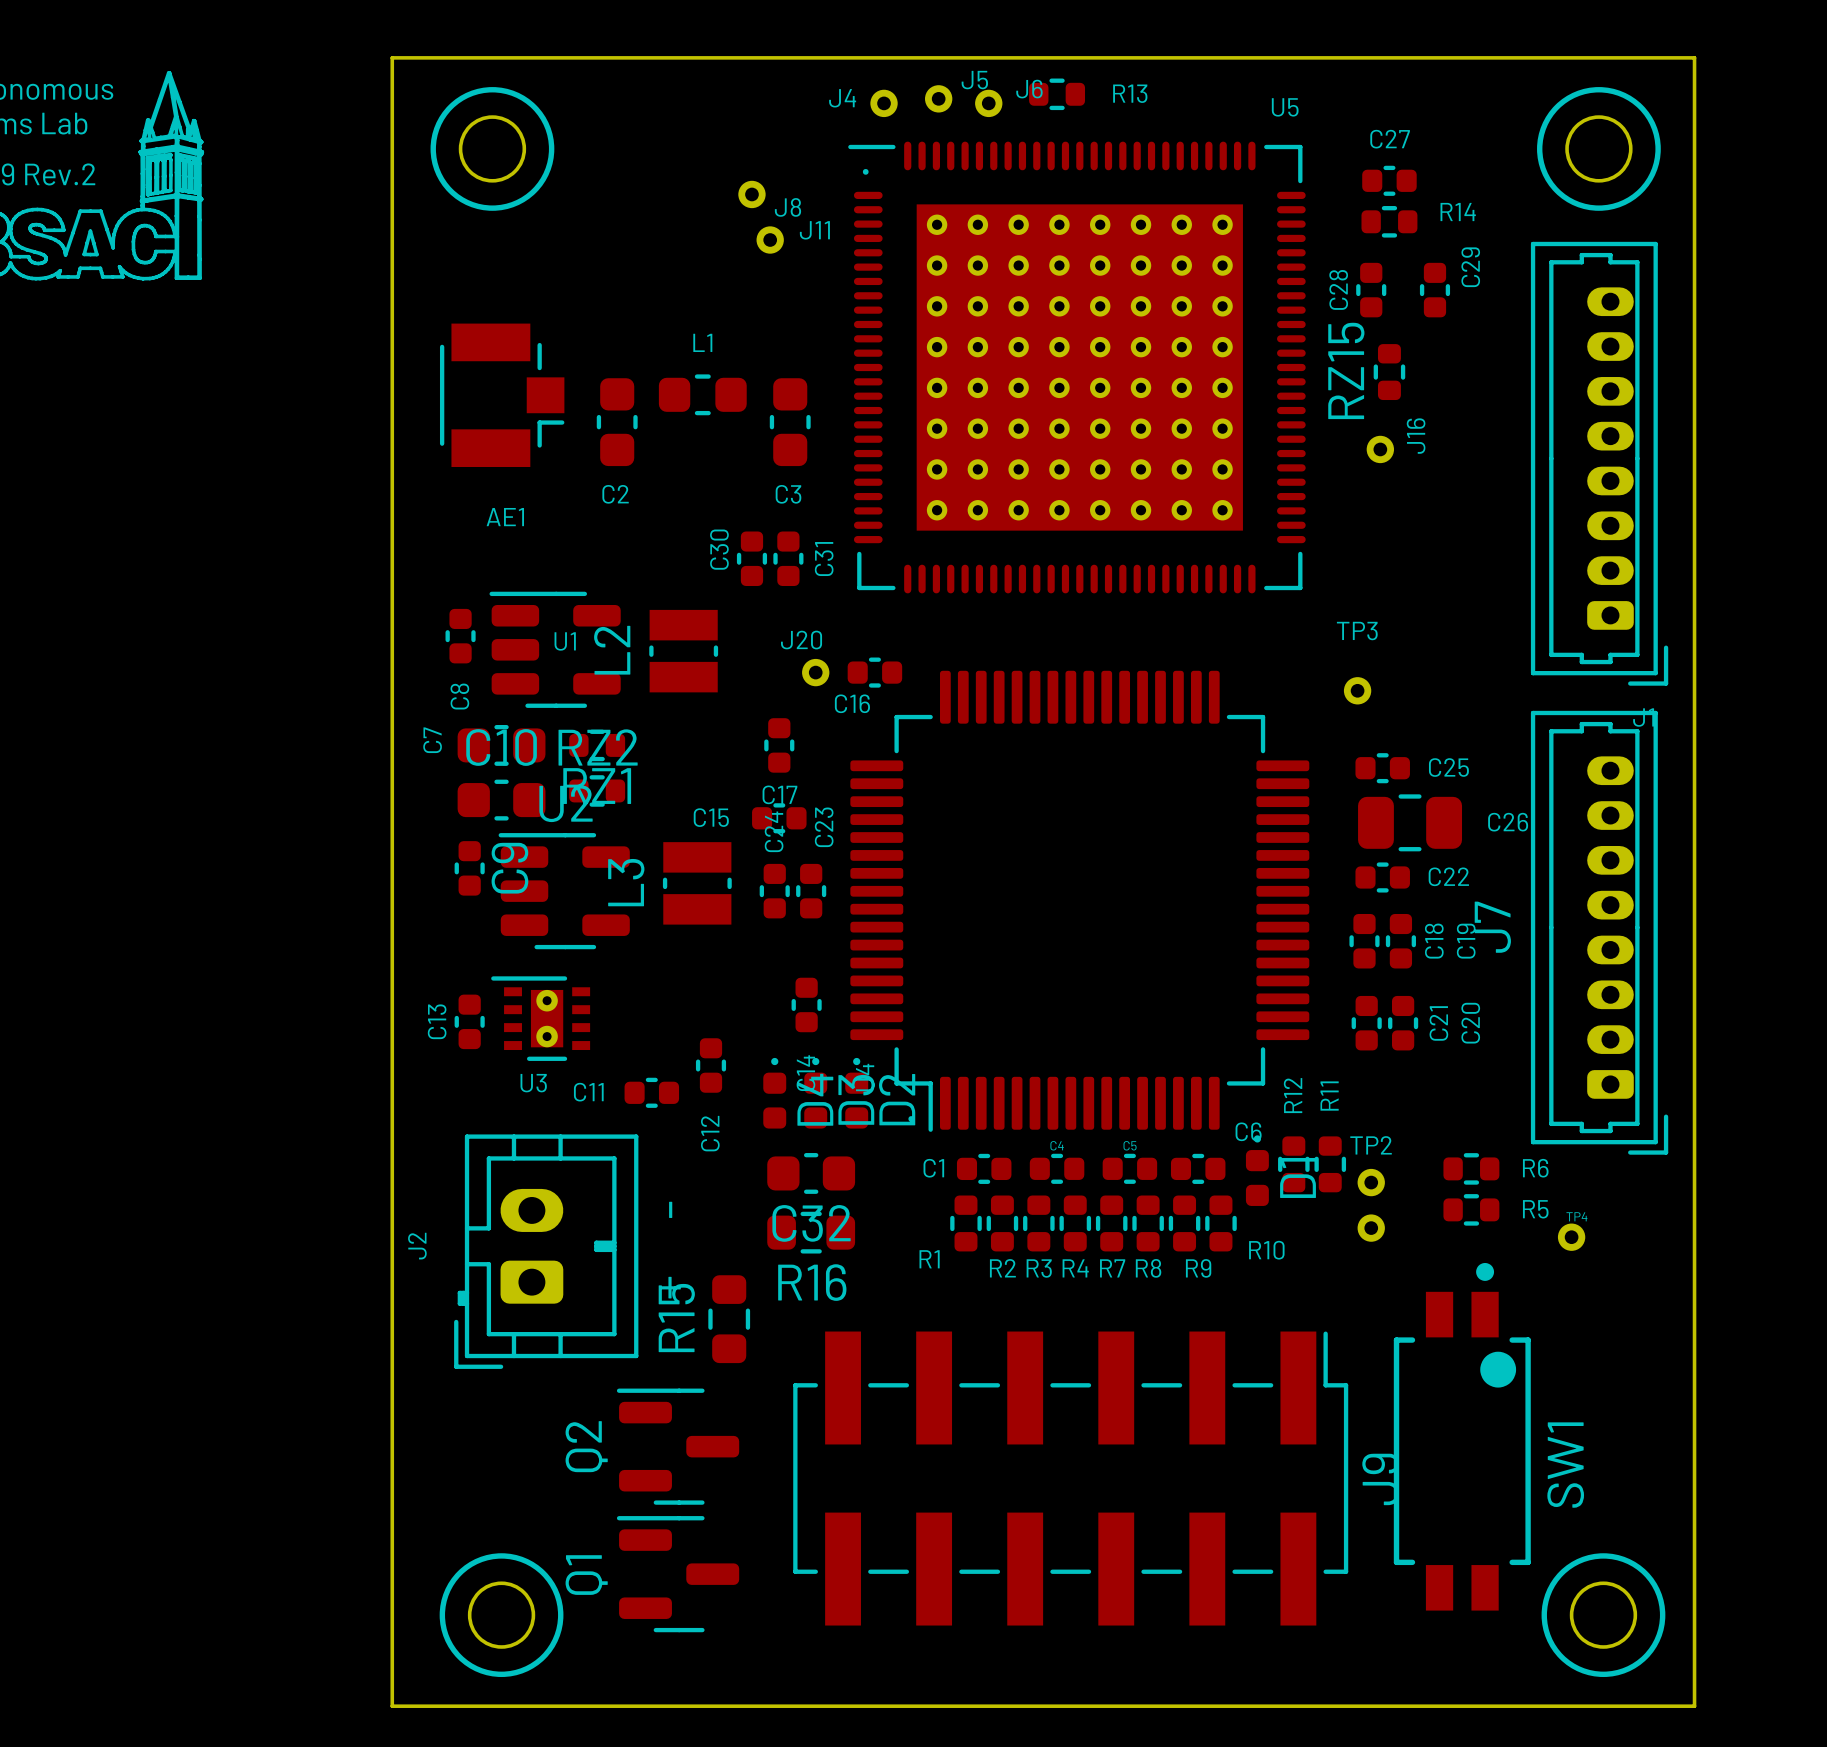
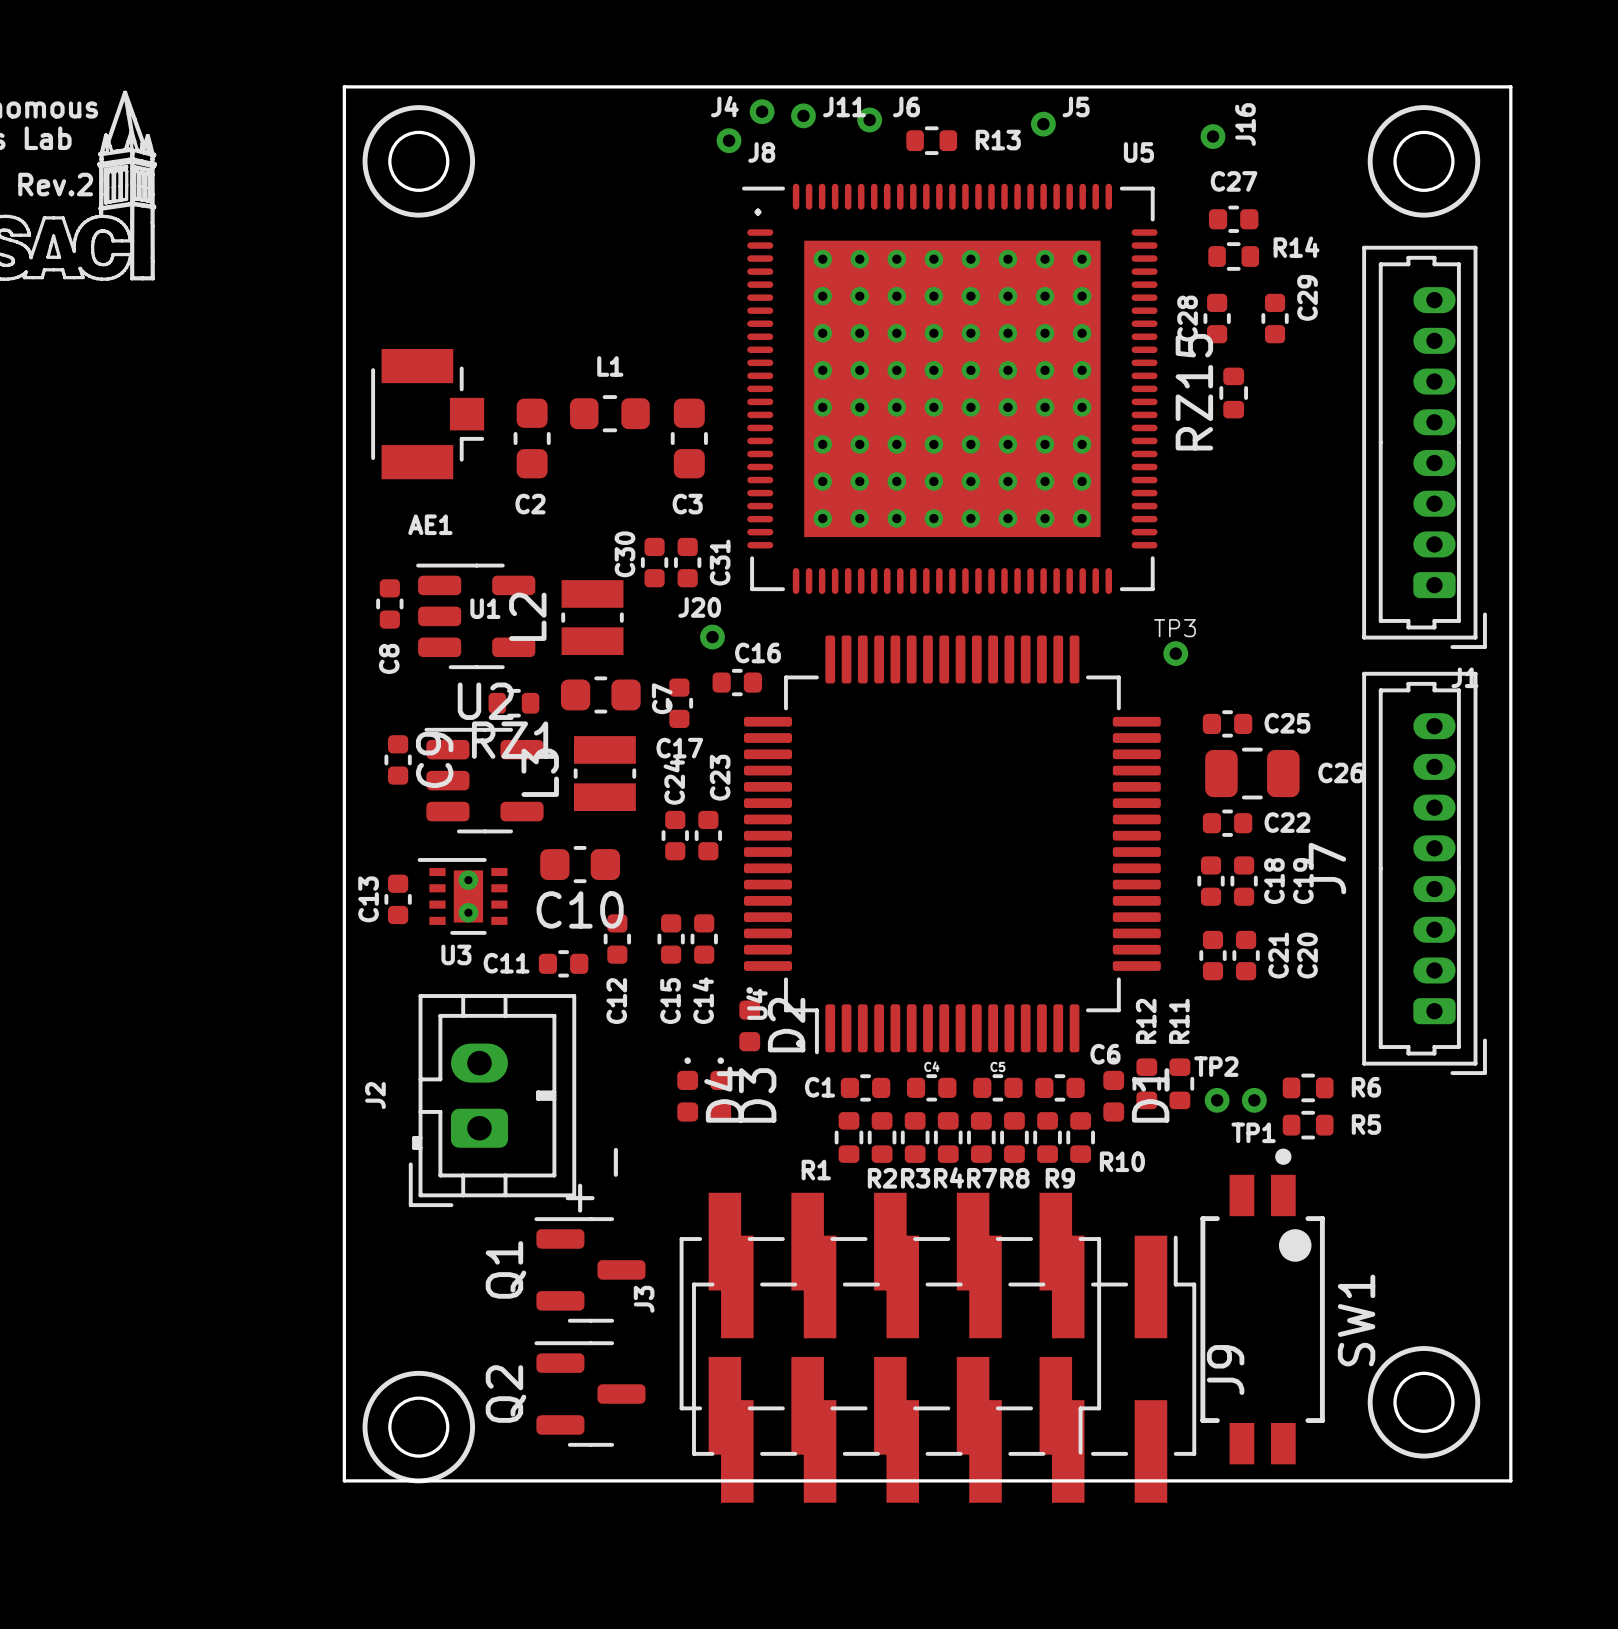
board edge: (1694, 66) (1694, 57) (392, 57) (392, 1706) (1694, 1706) (1694, 1601) -> (1510, 86) (344, 86) (344, 1480) (1510, 1480)
R13 position: (1057, 94) -> (931, 140)
J5 position: (938, 98) -> (1043, 124)
J4 position: (884, 103) -> (762, 111)
text position: . (865, 171) -> . (757, 212)
C27 position: (1389, 180) -> (1233, 219)
J8 position: (751, 194) -> (729, 140)
R14 position: (1389, 221) -> (1233, 256)
J11 position: (770, 240) -> (803, 115)
C28 position: (1371, 290) -> (1217, 318)
C29 position: (1434, 290) -> (1275, 318)
U5 position: (1076, 367) -> (949, 388)
RZ15 position: (1389, 372) -> (1233, 393)
L1 position: (702, 394) -> (609, 413)
AE1 position: (502, 395) -> (427, 414)
C2 position: (617, 422) -> (532, 438)
C3 position: (790, 422) -> (689, 438)
J16 position: (1380, 449) -> (1213, 136)
C30 position: (751, 558) -> (654, 562)
C31 position: (788, 558) -> (687, 562)
TP3 name position: TP3 (1357, 631) -> TP3 (1174, 628)
C16 position: (874, 672) -> (737, 682)
TP3 position: (1357, 690) -> (1175, 653)
C16 name position: C16 (852, 703) -> C16 (757, 652)
C7 name position: C7 (432, 740) -> C7 (662, 698)
C7 position: (501, 745) -> (600, 694)
C10 name position: C10 (501, 747) -> C10 (580, 909)
RZ2: (597, 790) -> none
C10 position: (501, 800) -> (580, 864)
C15 name position: C15 (711, 817) -> C15 (670, 1001)
C15 rotation: 0° (779, 818) -> 90° clockwise (671, 939)
C15 position: (779, 818) -> (671, 939)
C9 position: (469, 868) -> (398, 759)
L3 position: (697, 883) -> (604, 773)
U2 position: (564, 891) -> (484, 780)
U3 position: (540, 1018) -> (462, 896)
C13 position: (469, 1021) -> (398, 899)
C12 position: (711, 1065) -> (617, 939)
C11 position: (651, 1092) -> (563, 963)
D4 position: (774, 1093) -> (687, 1089)
D3 position: (815, 1093) -> (720, 1089)
C32: (811, 1173) -> none
text position: - (670, 1209) -> - (615, 1162)
TP1 position: (1371, 1228) -> (1254, 1100)
R16: (811, 1232) -> none
TP4: (1571, 1237) -> none
J2 position: (546, 1251) -> (492, 1100)
R15: (729, 1319) -> none
J3: none -> (890, 1323)
SW1 position: (1462, 1436) -> (1262, 1306)
Q2 position: (678, 1446) -> (589, 1394)
Q1 position: (678, 1574) -> (589, 1269)
drawing position: (501, 1615) -> (418, 1427)
round board edge position: (501, 1615) -> (418, 1427)
drawing position: (1603, 1615) -> (1423, 1402)
round board edge position: (1603, 1615) -> (1423, 1402)

